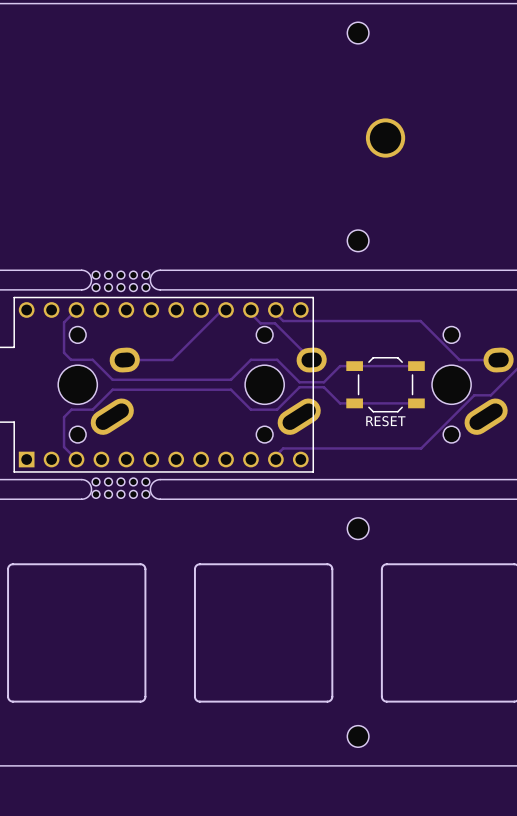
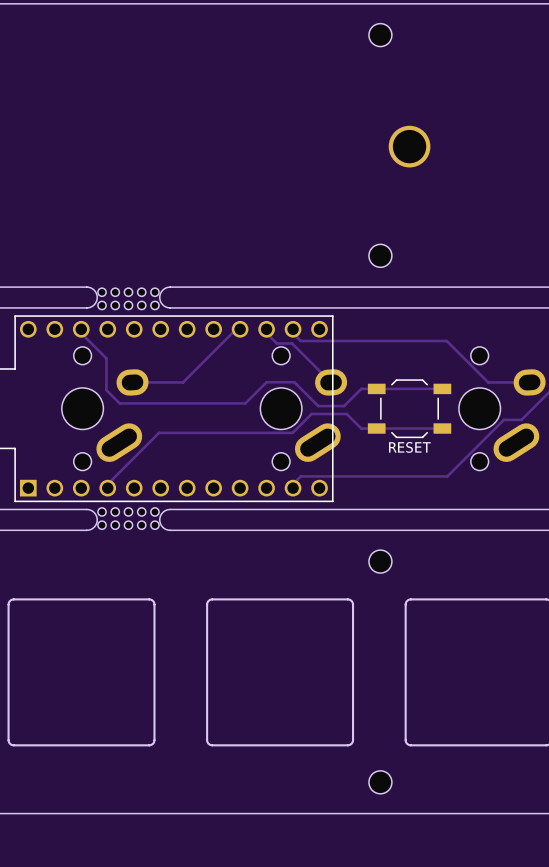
track: (76, 309) (64, 322) (64, 352) (71, 359) (92, 359) (100, 367) -> (77, 329) (106, 358) (106, 390)
track: (326, 389) (323, 387) (299, 387) (277, 409) (250, 409) (231, 389) (112, 389) (92, 409) (71, 409) (64, 417) (64, 447) (76, 459) -> (346, 414) (311, 414) (292, 432) (159, 432) (103, 488)

